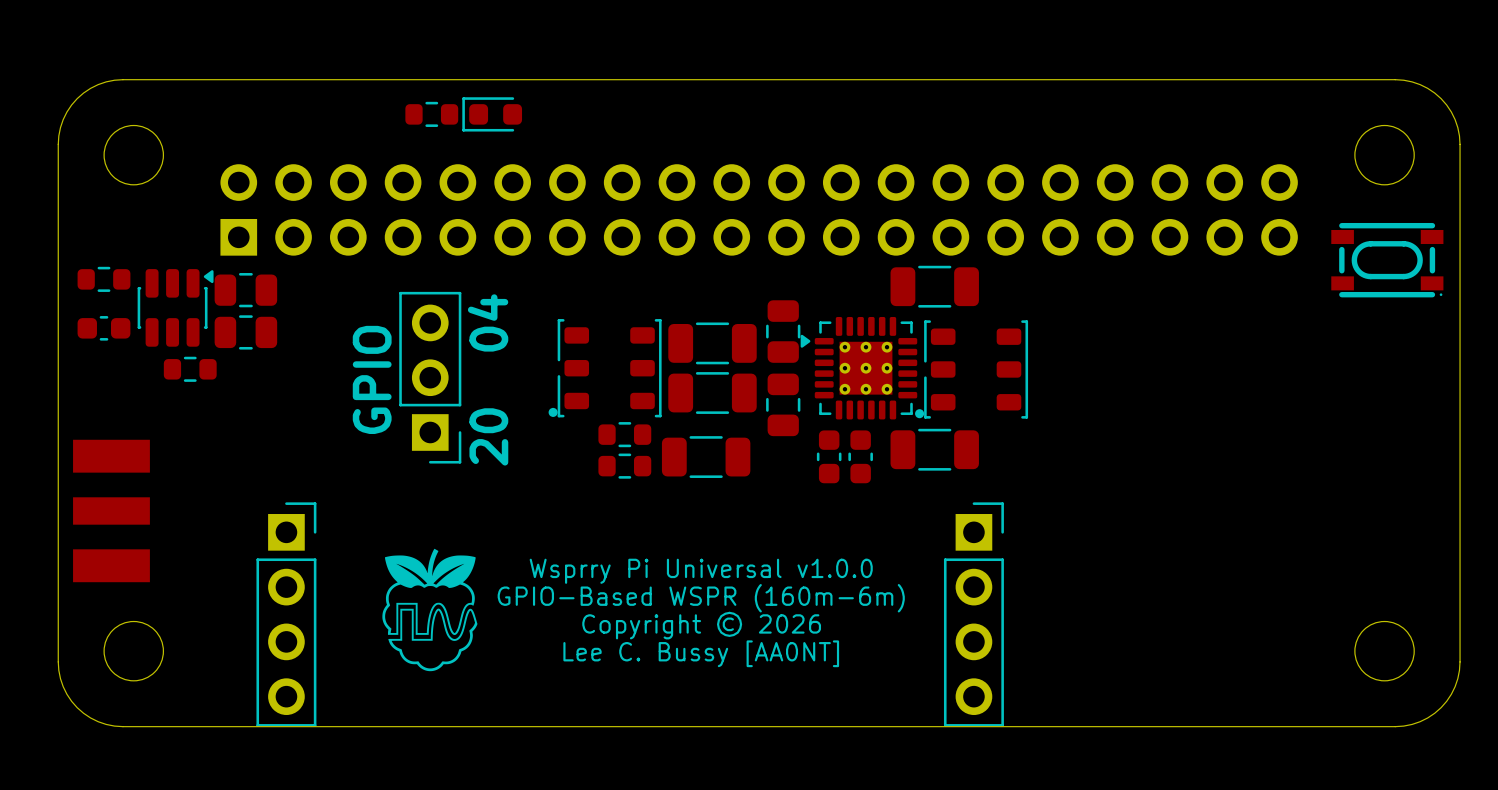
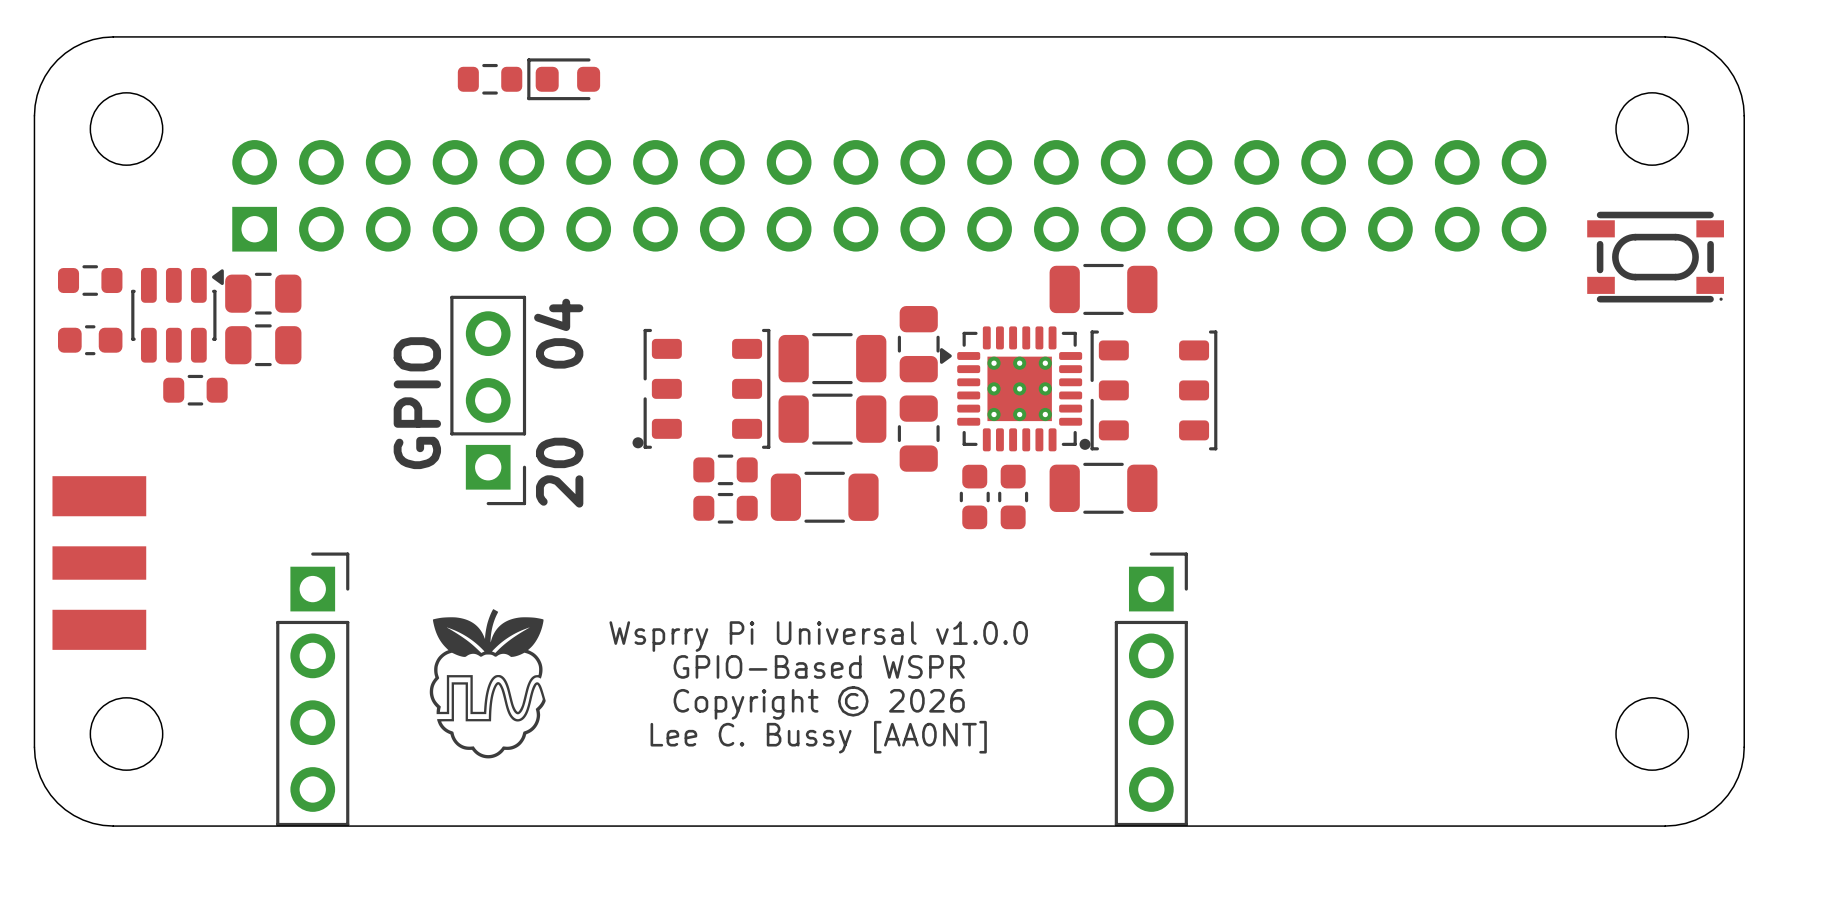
text: GPIO-Based WSPR (160m-6m) (701, 598) -> GPIO-Based WSPR (819, 666)

